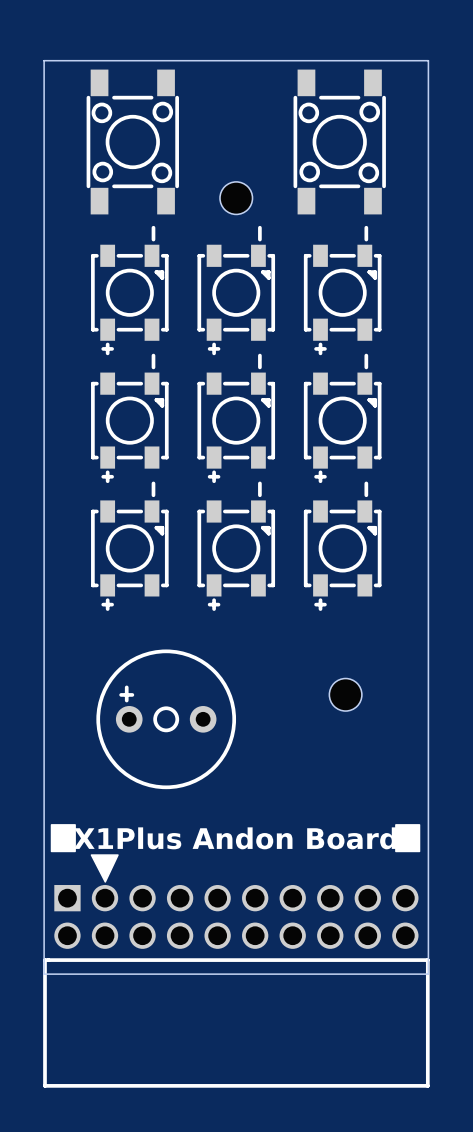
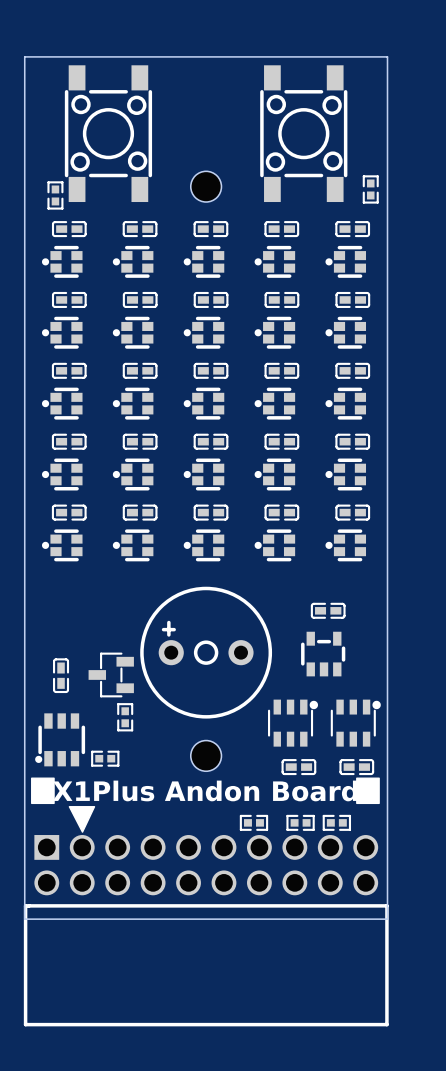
part rotation: 0° (132, 142) -> 180° (108, 133)
part rotation: 0° (339, 142) -> 180° (303, 133)
part: none -> (370, 189)
part: none -> (55, 195)
part footprint: [197, 225, 276, 356] -> [183, 245, 225, 278]
part: none -> (69, 229)
part: none -> (140, 229)
part: none -> (210, 229)
part: none -> (281, 229)
part: none -> (352, 229)
part: none -> (62, 261)
part: none -> (133, 261)
part: none -> (274, 261)
part: none -> (345, 261)
part: (129, 290) -> none
part: (342, 290) -> none
part: none -> (69, 299)
part: none -> (140, 299)
part: none -> (211, 299)
part: none -> (281, 299)
part: none -> (352, 299)
part: none -> (62, 332)
part: none -> (133, 332)
part: none -> (203, 332)
part: none -> (274, 332)
part: none -> (345, 332)
part footprint: [197, 353, 276, 484] -> [183, 387, 225, 420]
part: none -> (69, 370)
part: none -> (140, 370)
part: none -> (211, 370)
part: none -> (281, 370)
part: none -> (352, 370)
part: (129, 418) -> none
part: (342, 418) -> none
part: none -> (62, 403)
part: none -> (133, 403)
part: none -> (274, 403)
part: none -> (345, 403)
part: none -> (69, 441)
part: none -> (140, 441)
part: none -> (211, 441)
part: none -> (281, 441)
part: none -> (352, 441)
part footprint: [197, 481, 276, 611] -> [193, 504, 229, 521]
part: none -> (62, 474)
part: none -> (133, 474)
part: none -> (203, 474)
part: none -> (274, 474)
part: none -> (345, 474)
part: none -> (69, 512)
part: none -> (140, 512)
part: none -> (281, 512)
part: none -> (352, 512)
part: (129, 546) -> none
part: (342, 546) -> none
part: none -> (62, 545)
part: none -> (133, 545)
part: none -> (203, 545)
part: none -> (274, 545)
part: none -> (345, 545)
part: none -> (328, 610)
part footprint: [329, 678, 362, 712] -> [301, 631, 346, 677]
part: none -> (111, 674)
part: none -> (61, 675)
part position: (166, 719) -> (206, 652)
part: none -> (125, 717)
part: none -> (293, 723)
part: none -> (355, 723)
part: none -> (60, 739)
part: none -> (206, 755)
part: none -> (105, 758)
part: none -> (298, 767)
part: none -> (356, 767)
part: none -> (253, 822)
part: none -> (300, 822)
part: none -> (336, 822)

